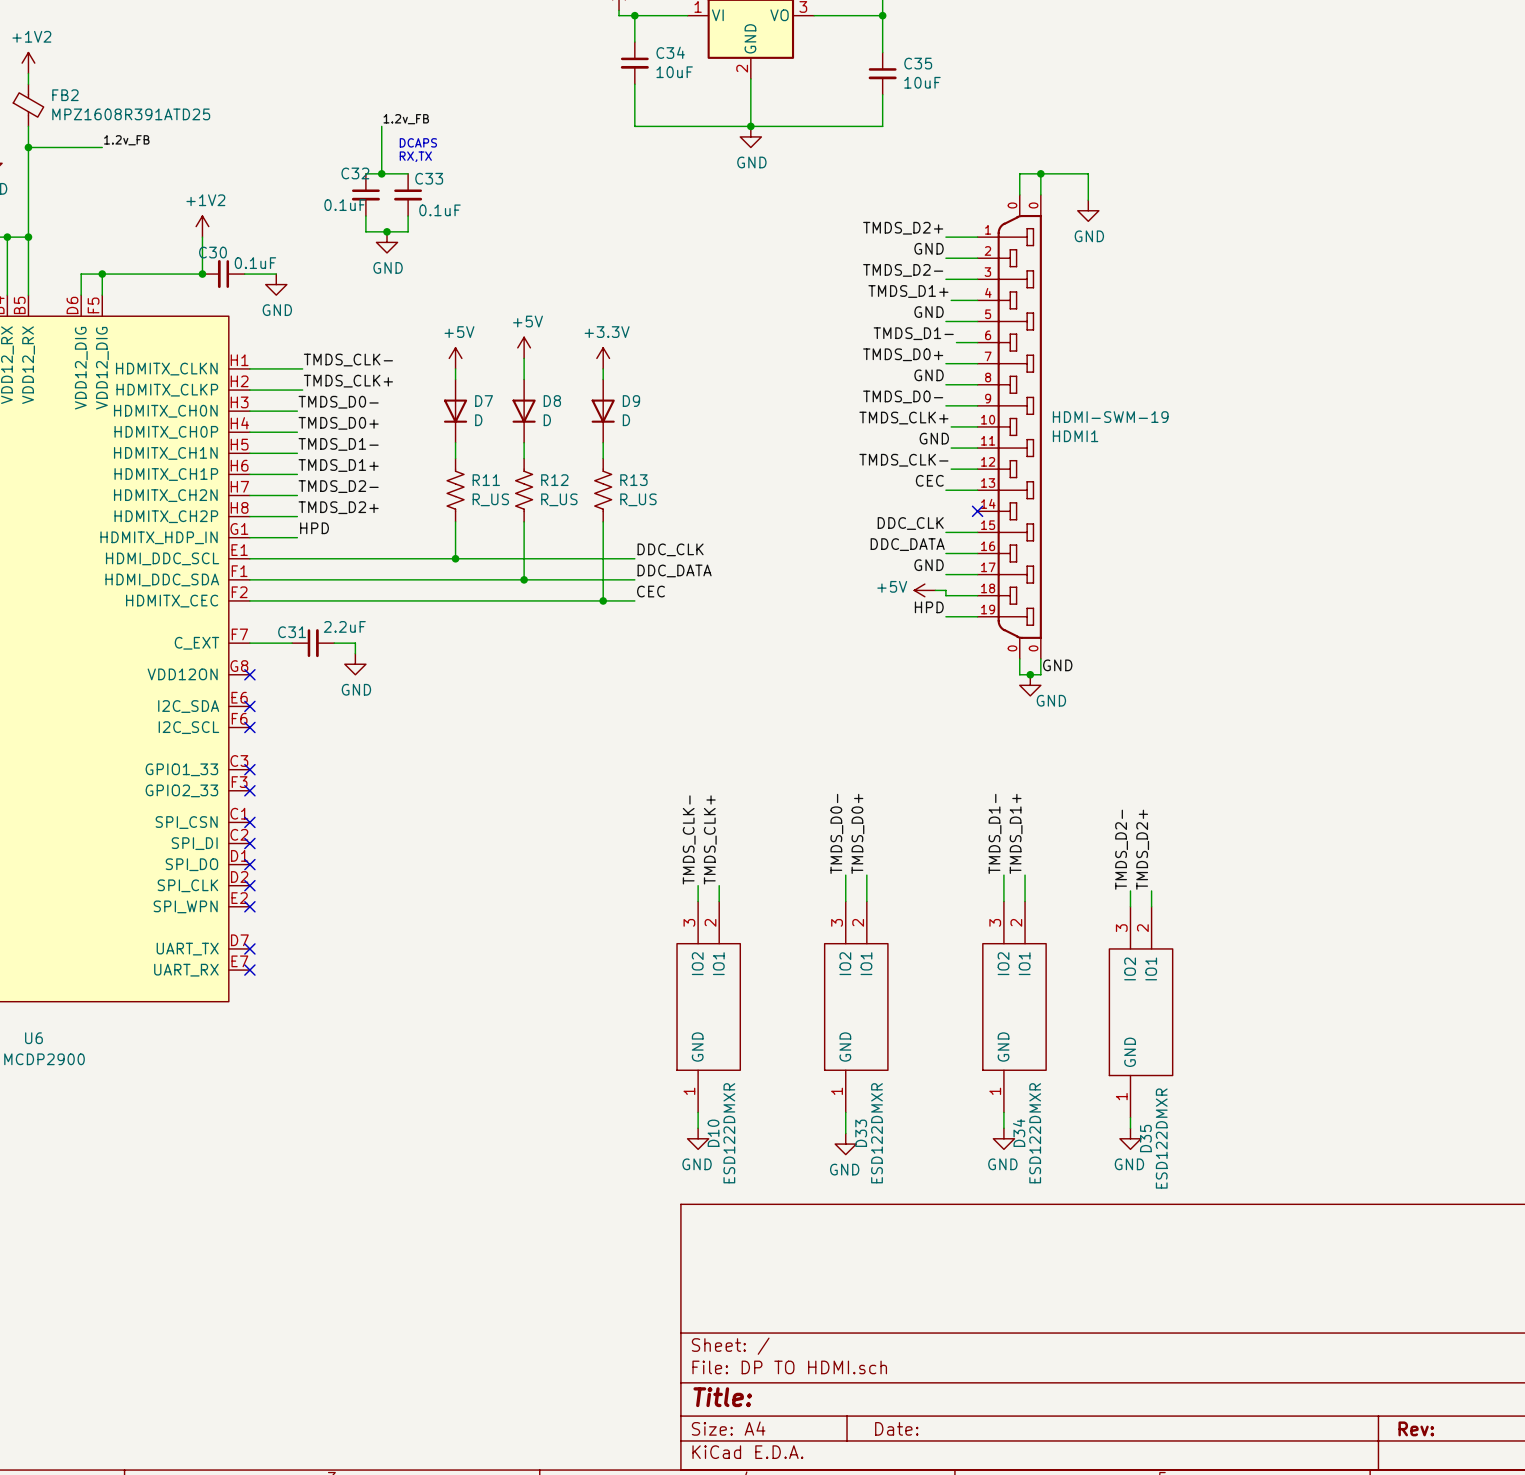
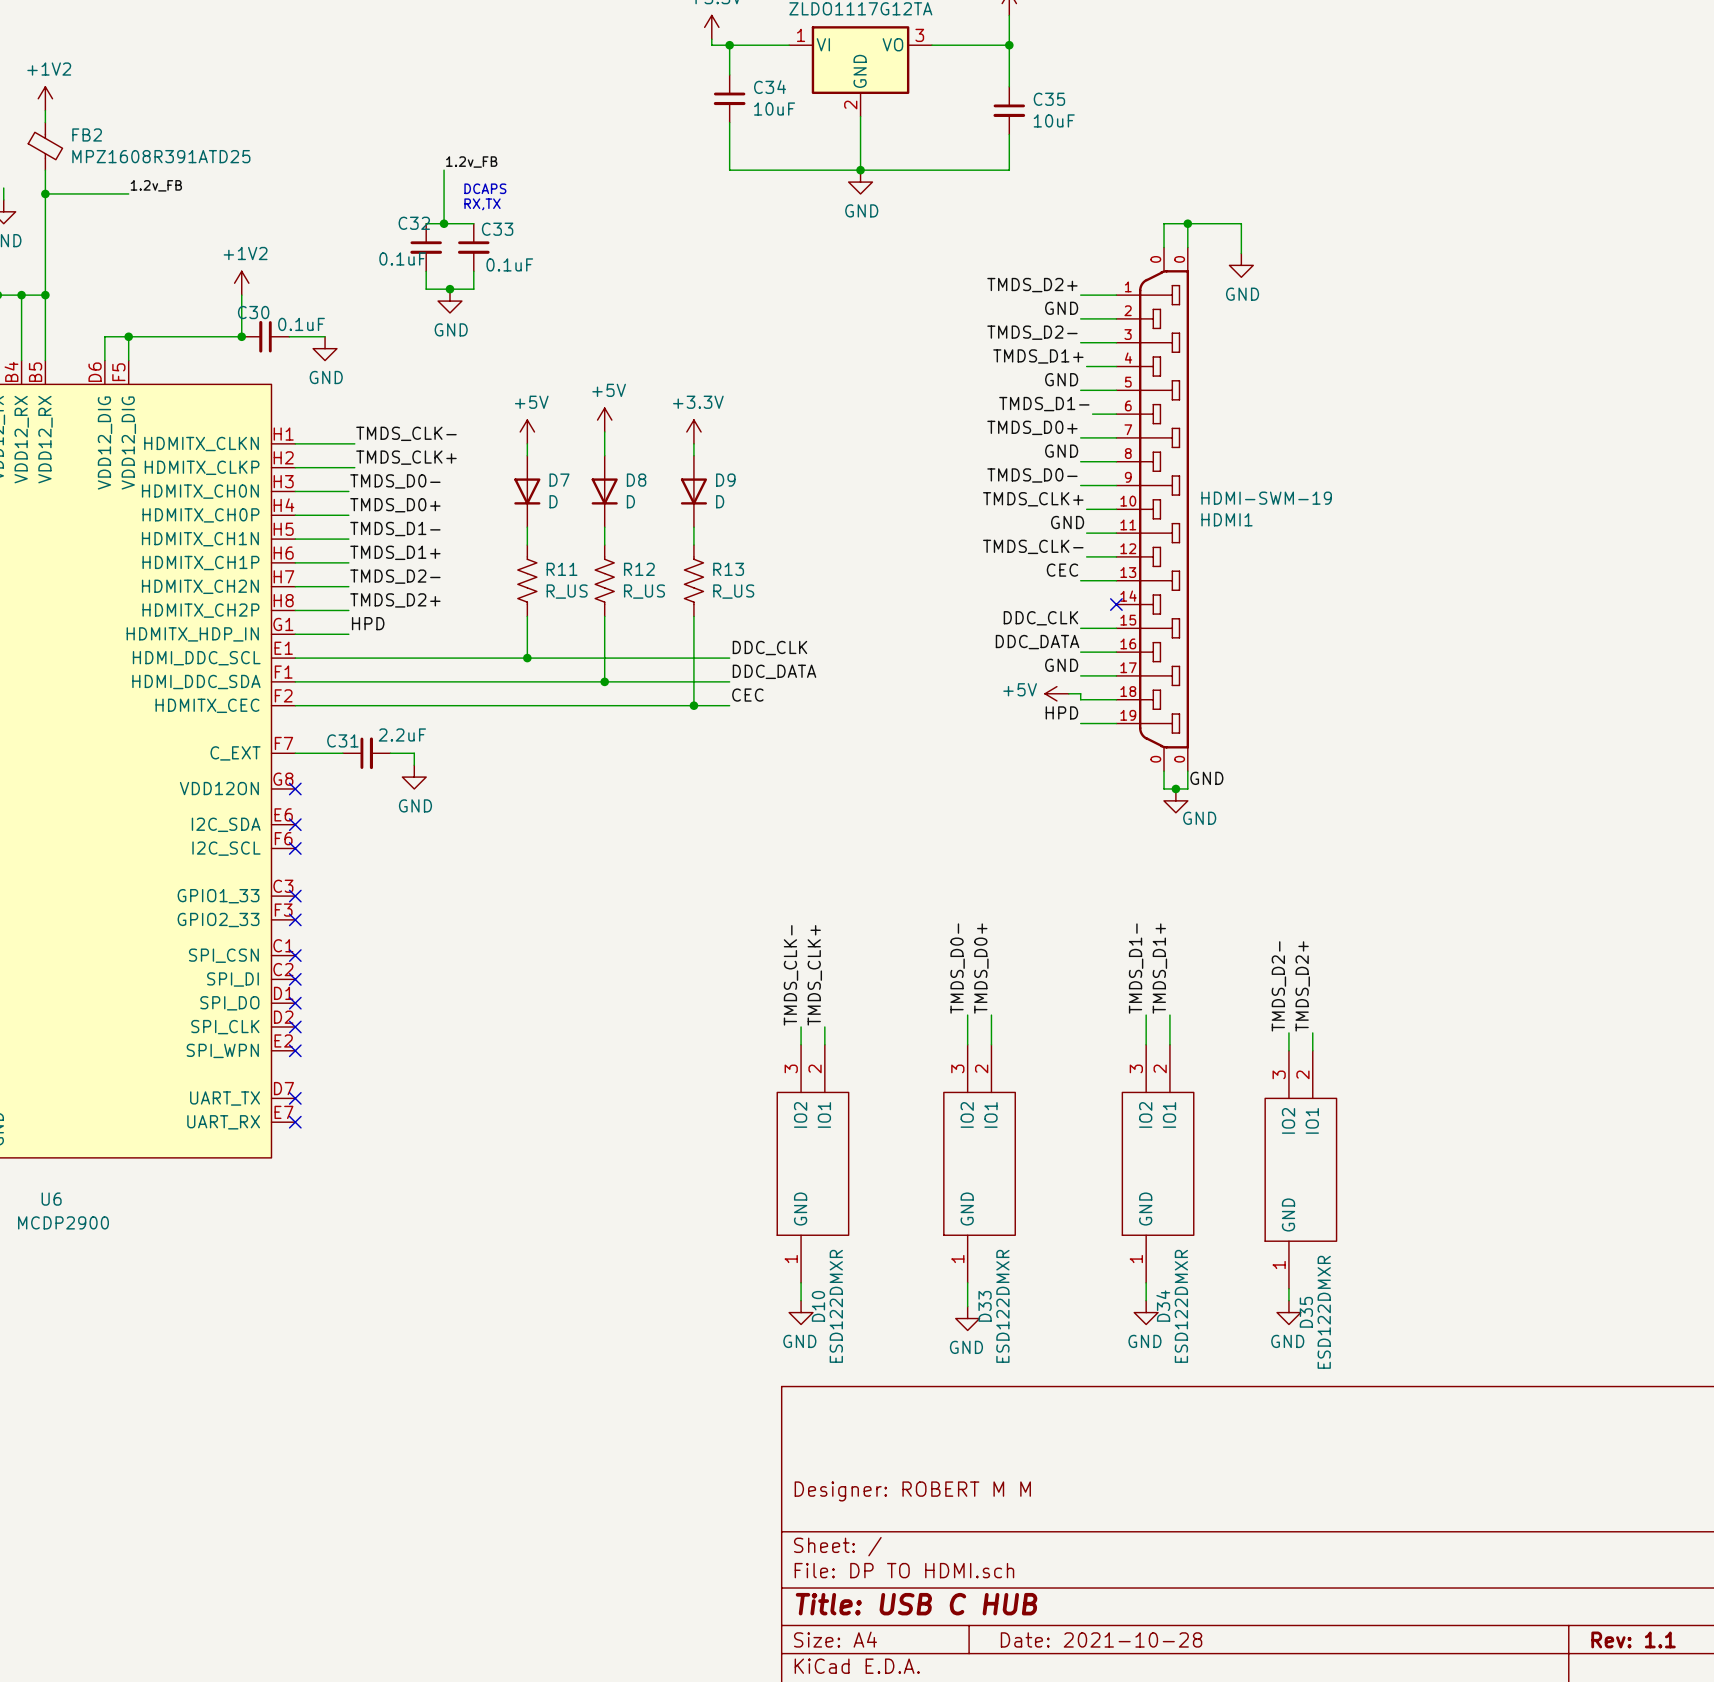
title block: none -> Designer: ROBERT M M (912, 1491)
title block: Title: (722, 1397) -> Title: USB C HUB (916, 1604)
title block: Date: (896, 1428) -> Date: 2021-10-28 (1101, 1639)
title block: Rev: (1416, 1428) -> Rev: 1.1 (1633, 1639)

